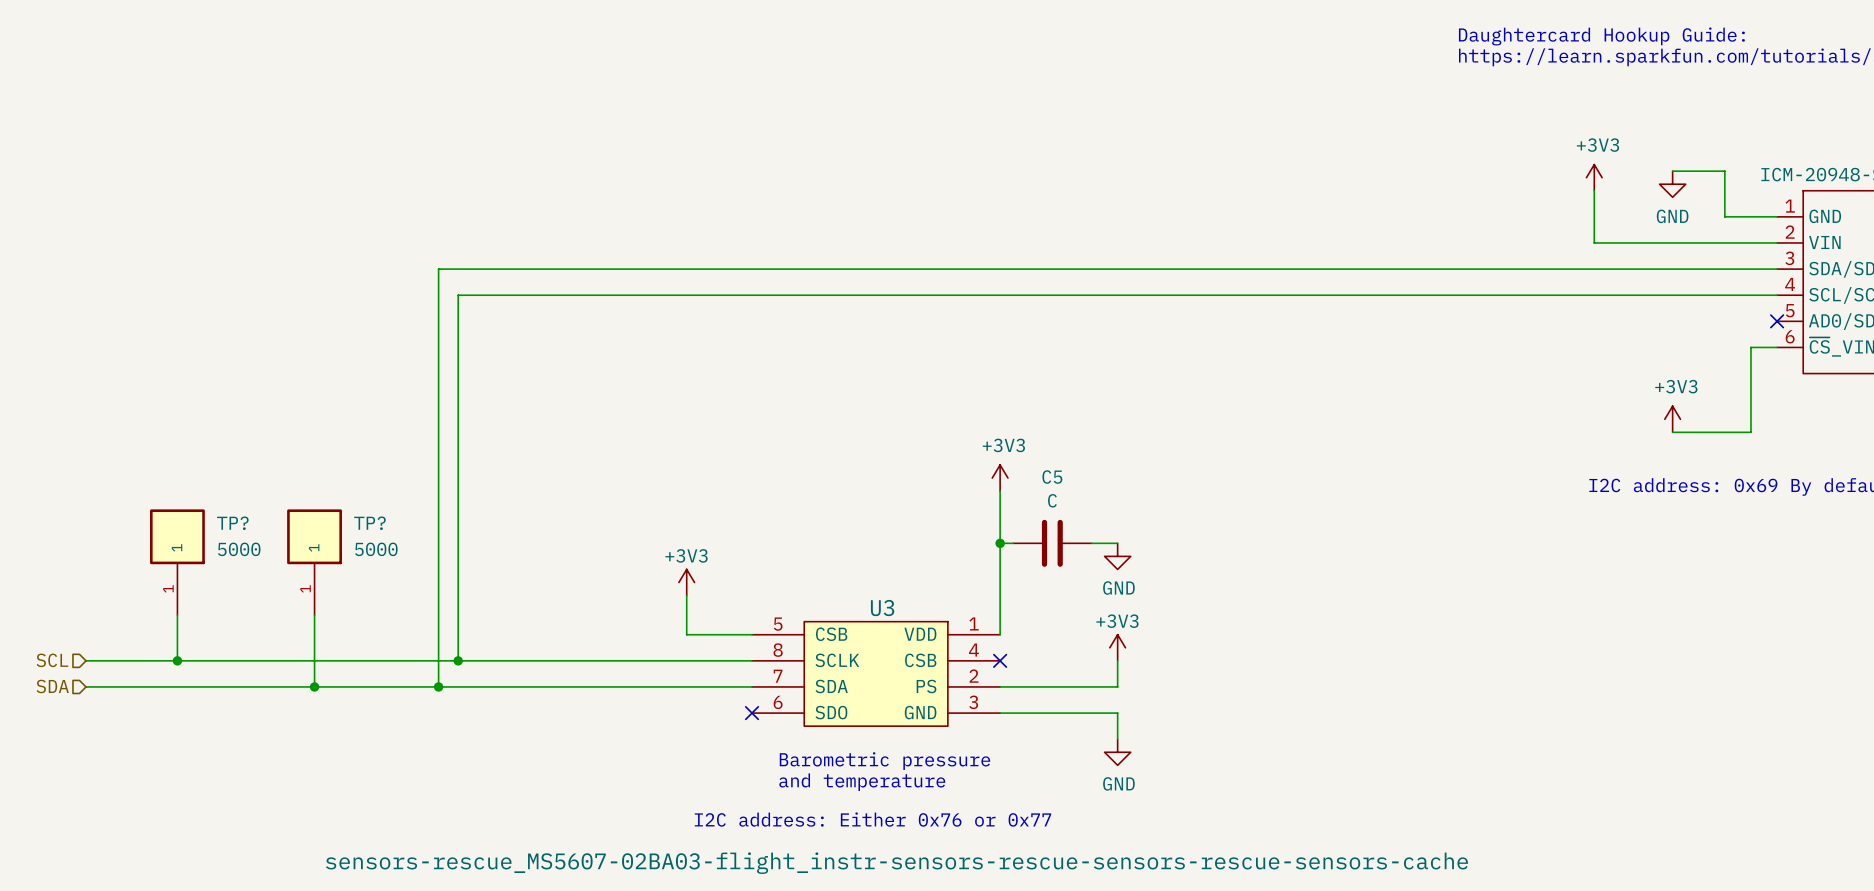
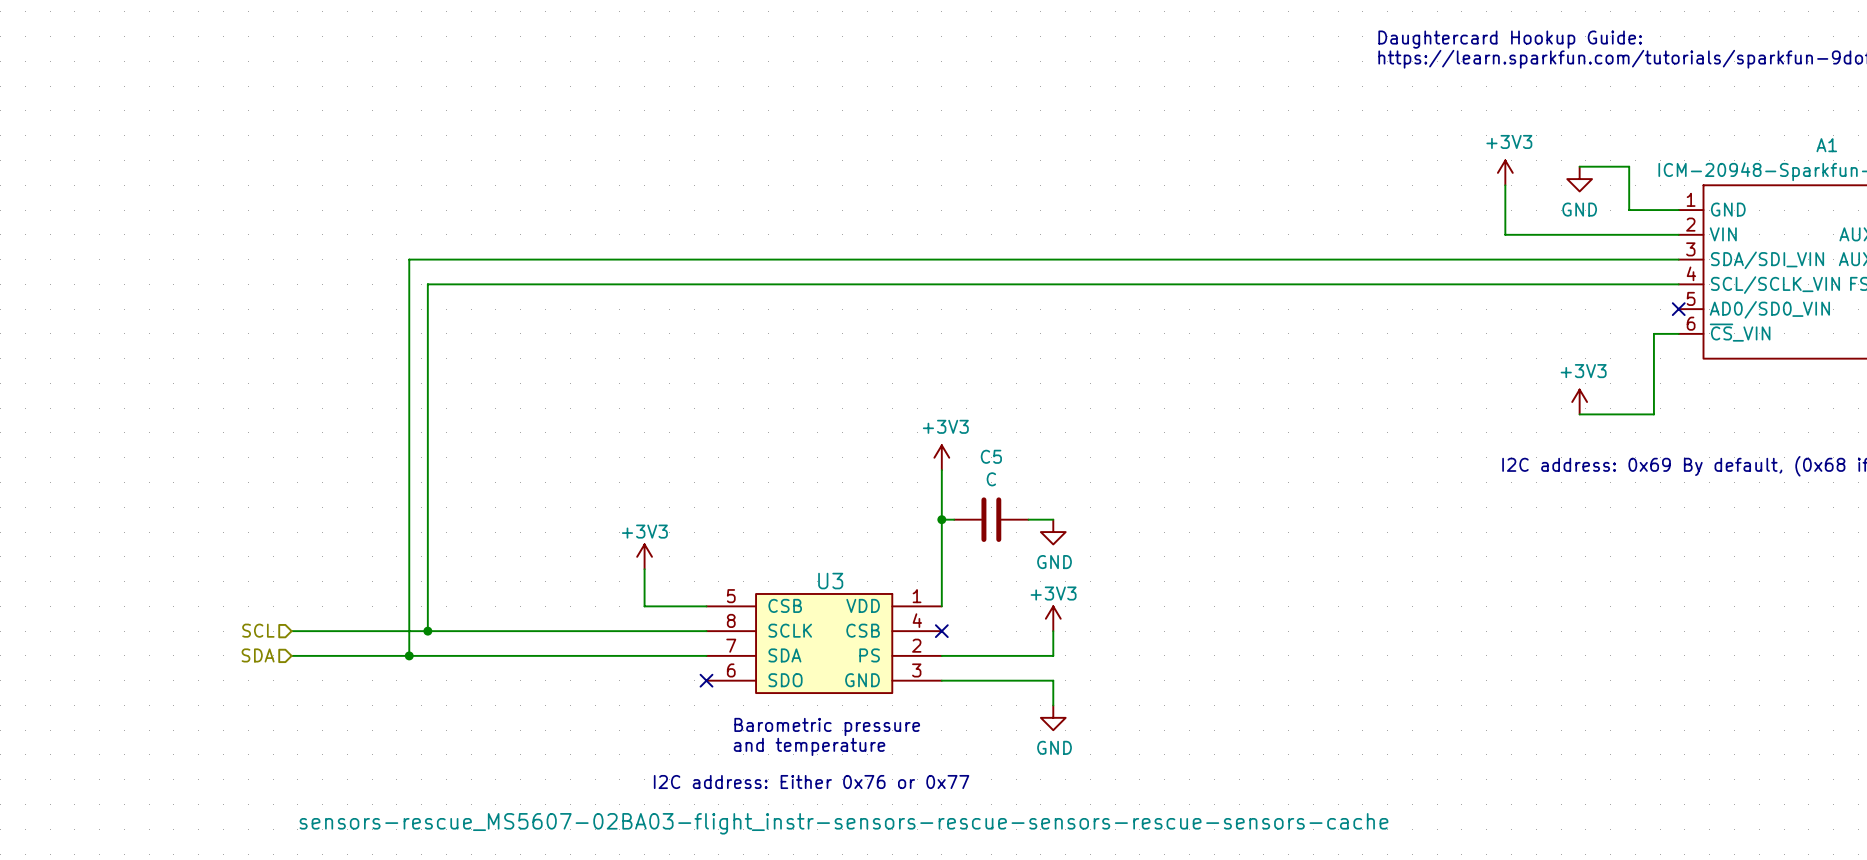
TP?: 5000 (177, 562) -> none
TP?: 5000 (314, 562) -> none
wire: (177, 615) (177, 660) -> none
wire: (314, 615) (314, 686) (86, 686) -> none
hierarchical label position: SCL (52, 660) -> SCL (258, 630)
wire: (86, 660) (314, 660) -> none
junction: (177, 660) -> none
hierarchical label position: SDA (52, 686) -> SDA (258, 655)
junction: (314, 686) -> none

